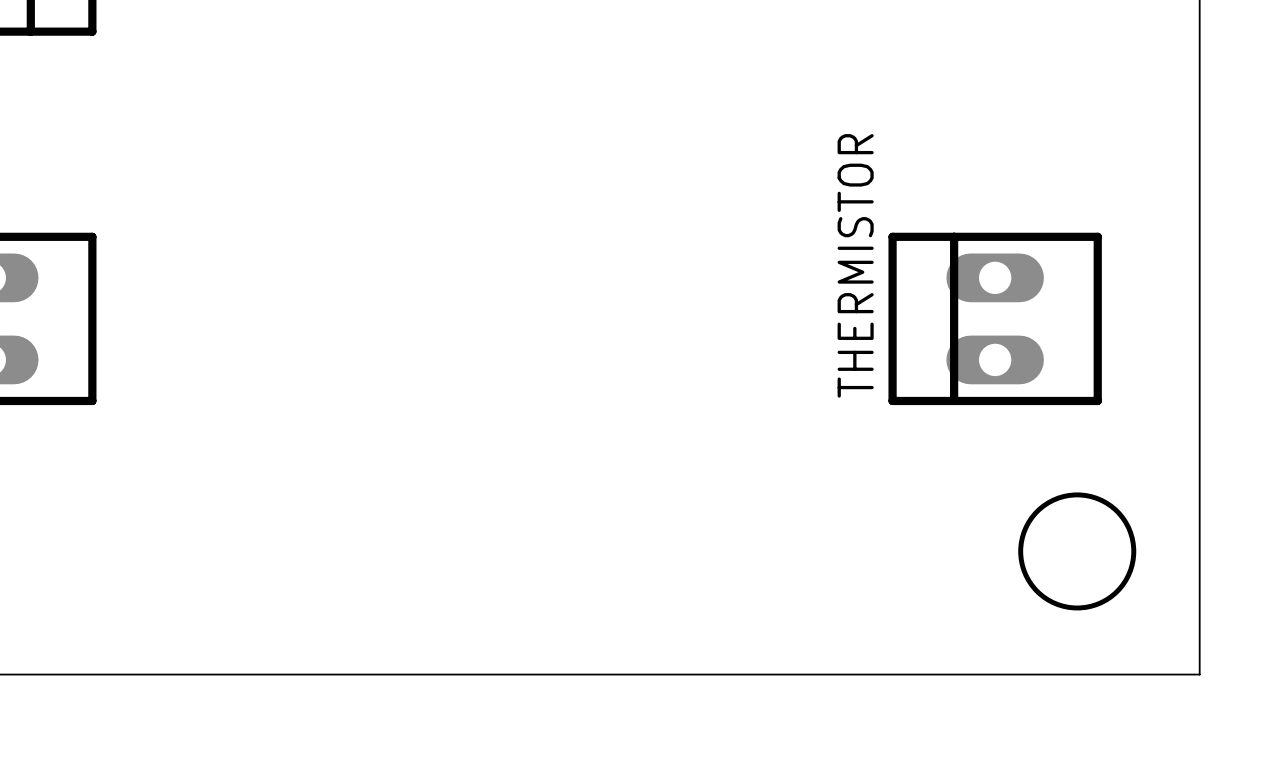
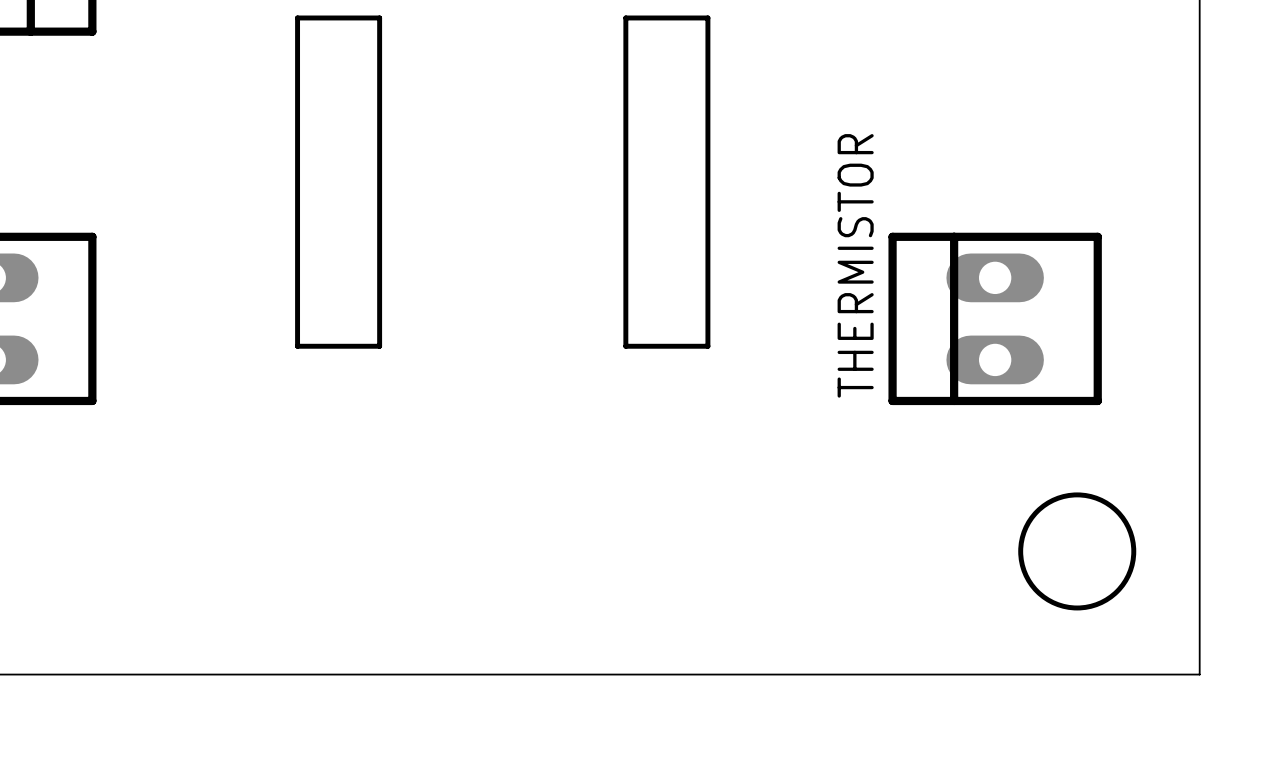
board edge: none -> (297, 17) (379, 17) (379, 346) (297, 346) (297, 17)
board edge: none -> (625, 17) (707, 17) (707, 346) (625, 346) (625, 17)

